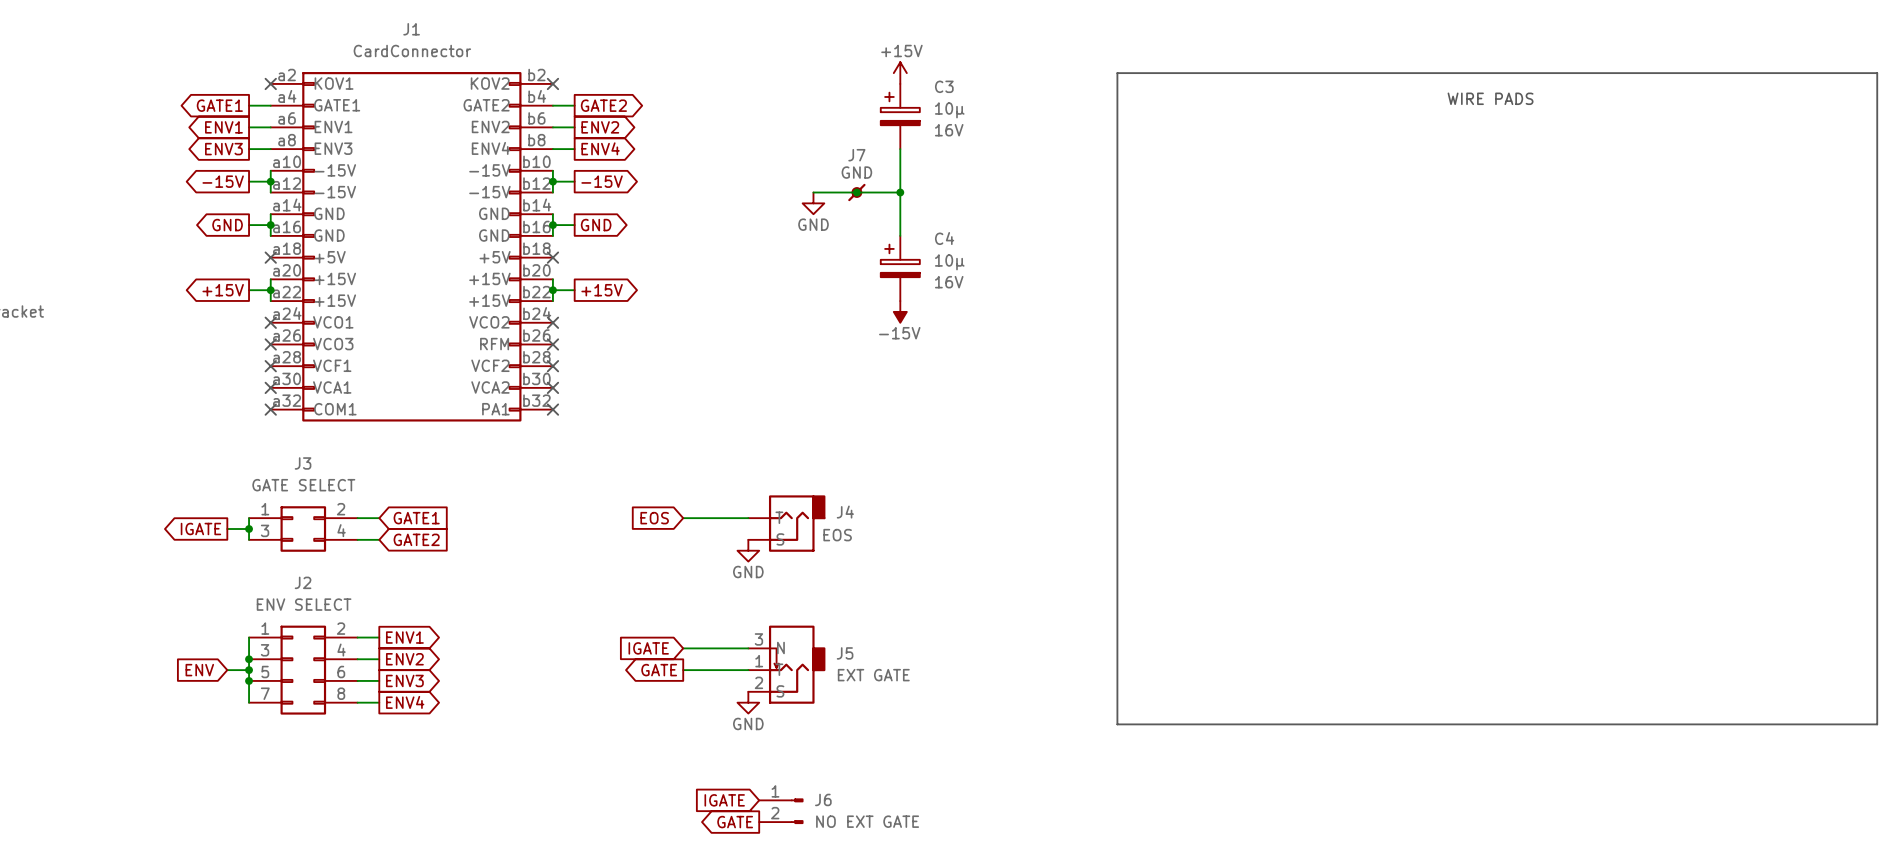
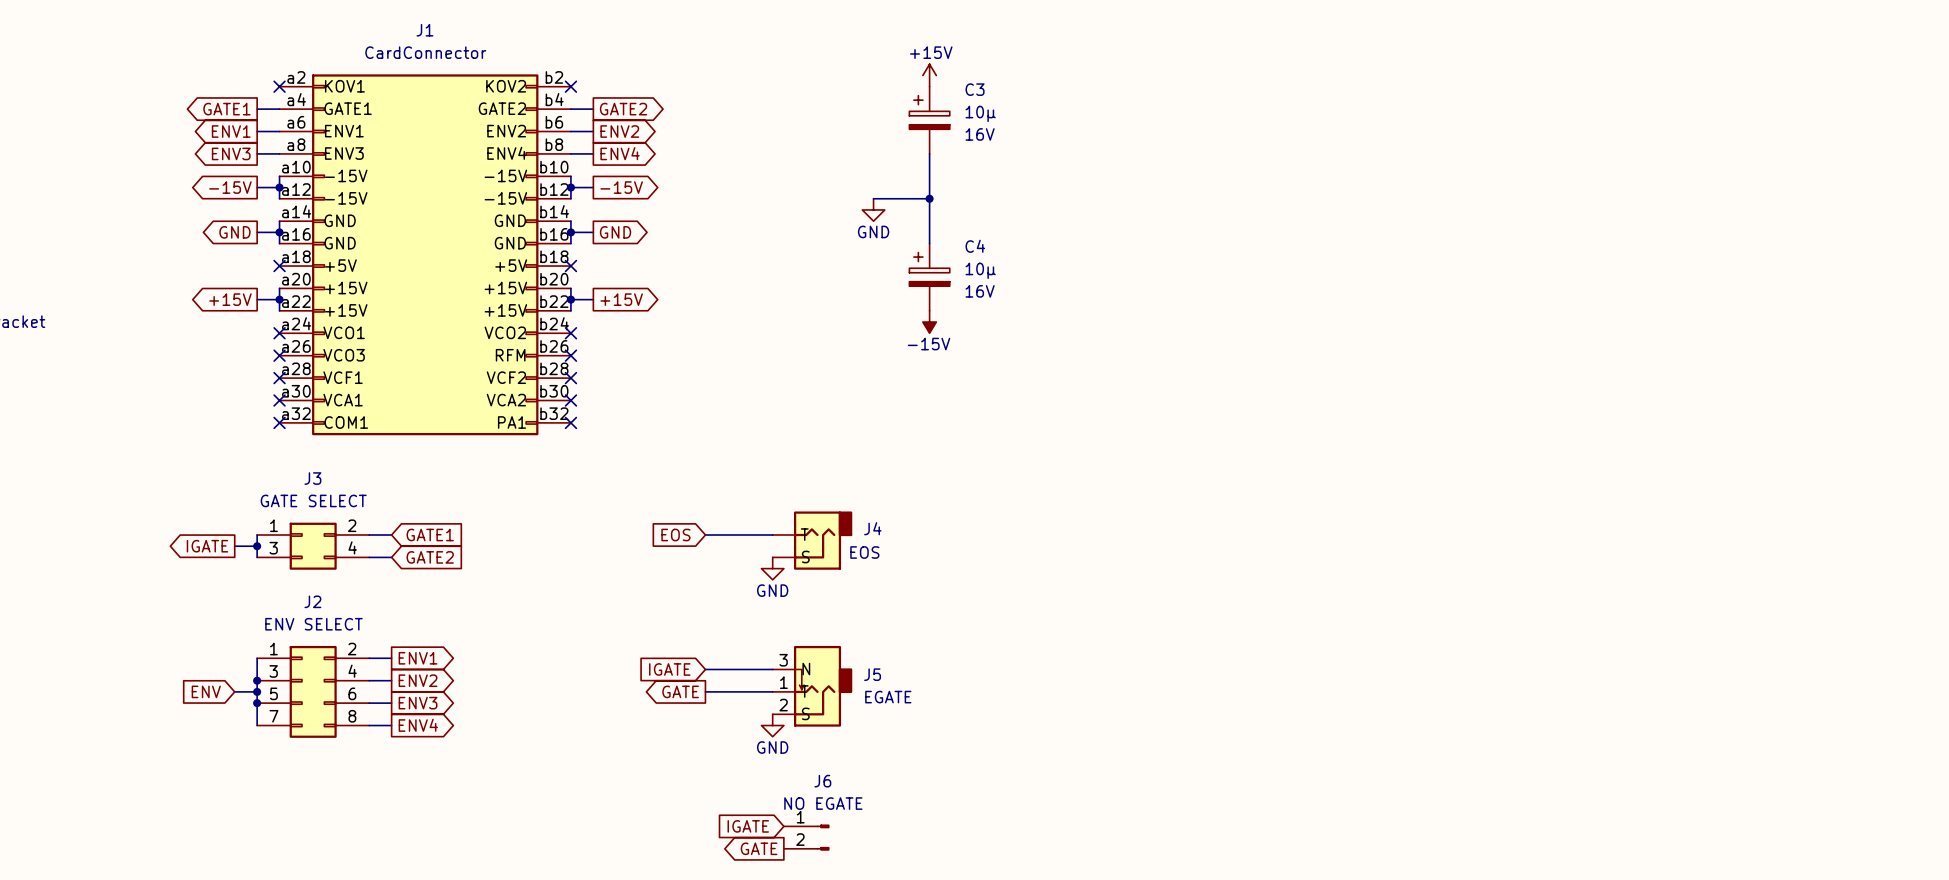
line: (1117, 73) (1877, 73) (1877, 724) (1117, 724) (1117, 73) -> none
text: WIRE PADS (1490, 98) -> none
wire: (813, 192) (846, 192) -> none
junction: (856, 192) -> none
J7: GND (856, 192) -> none
power symbol position: GND (813, 203) -> GND (873, 209)
J5 value: EXT GATE (873, 675) -> EGATE (888, 697)
J6 name position: J6 (823, 799) -> J6 (822, 781)
J6 value: NO EXT GATE (867, 821) -> NO EGATE (823, 803)

